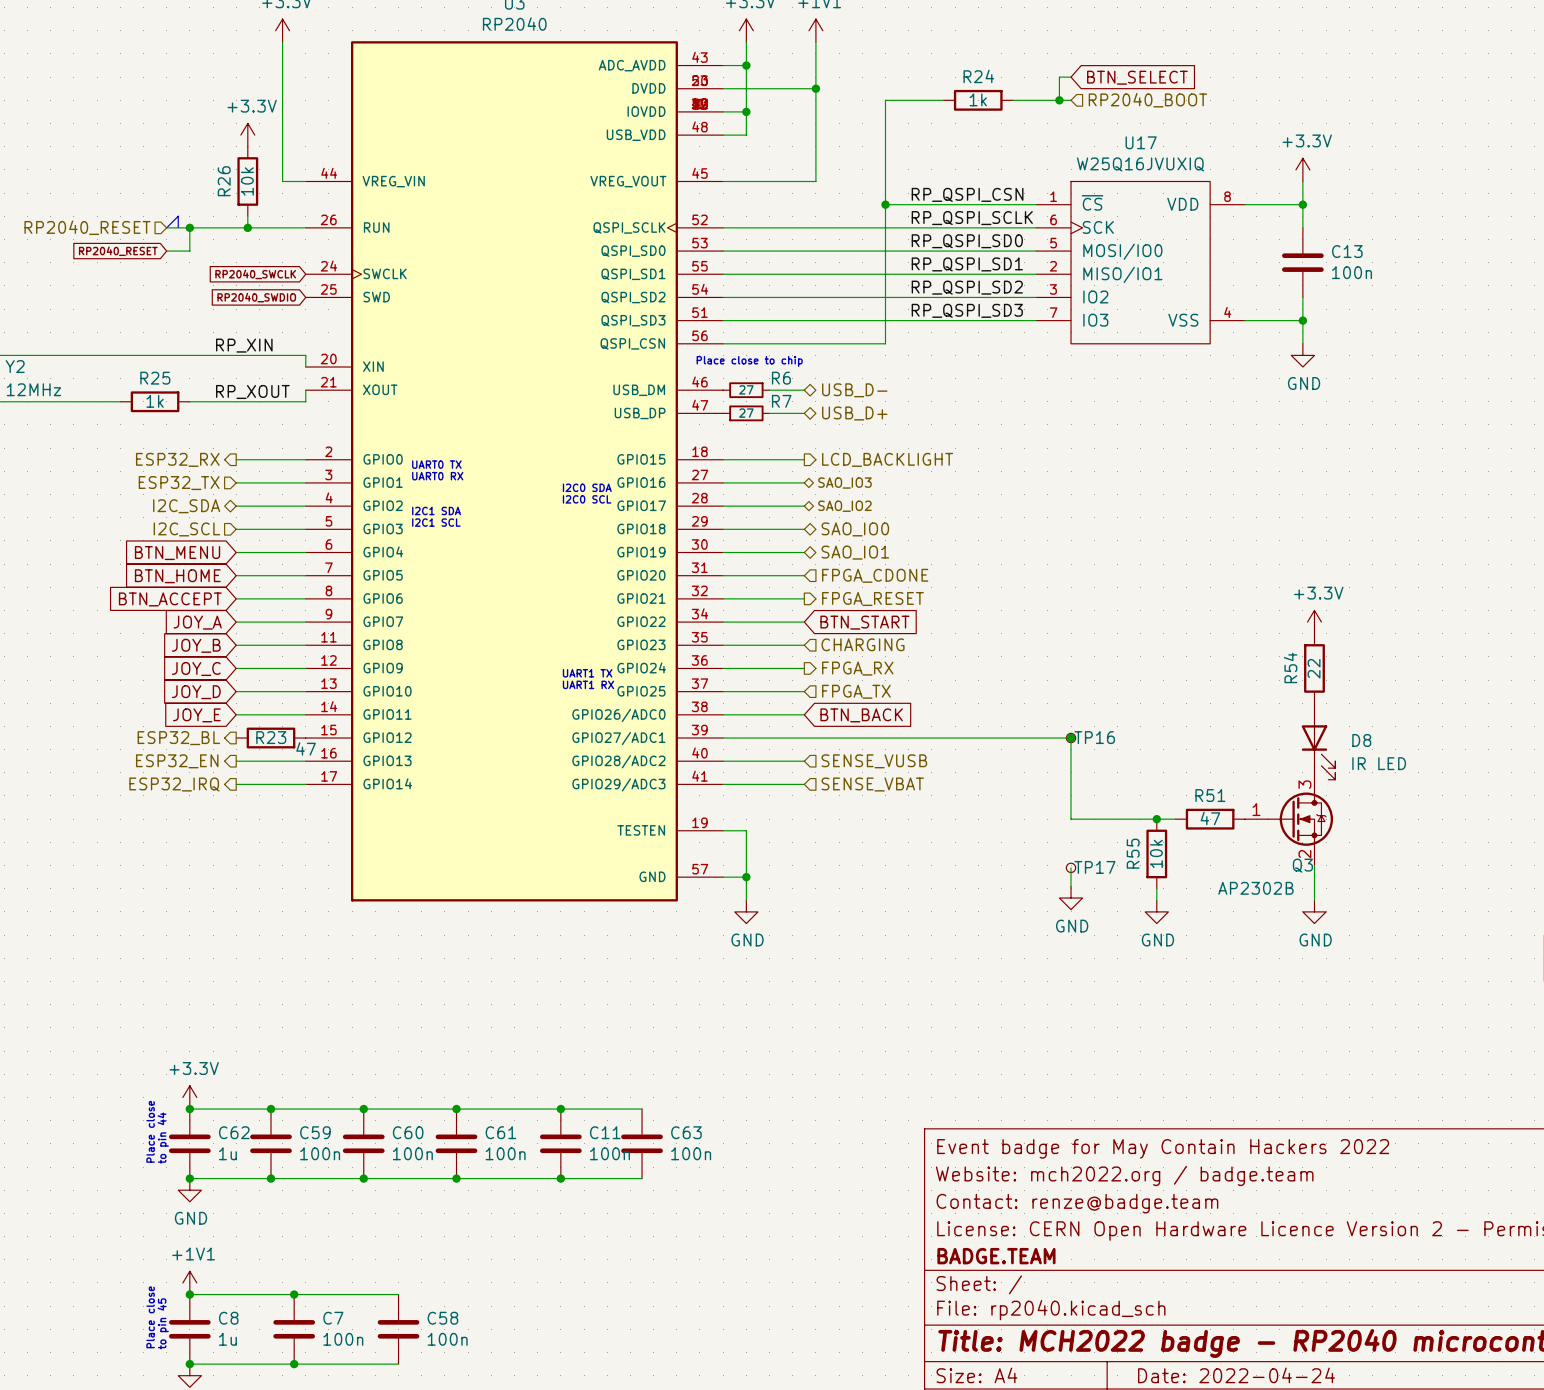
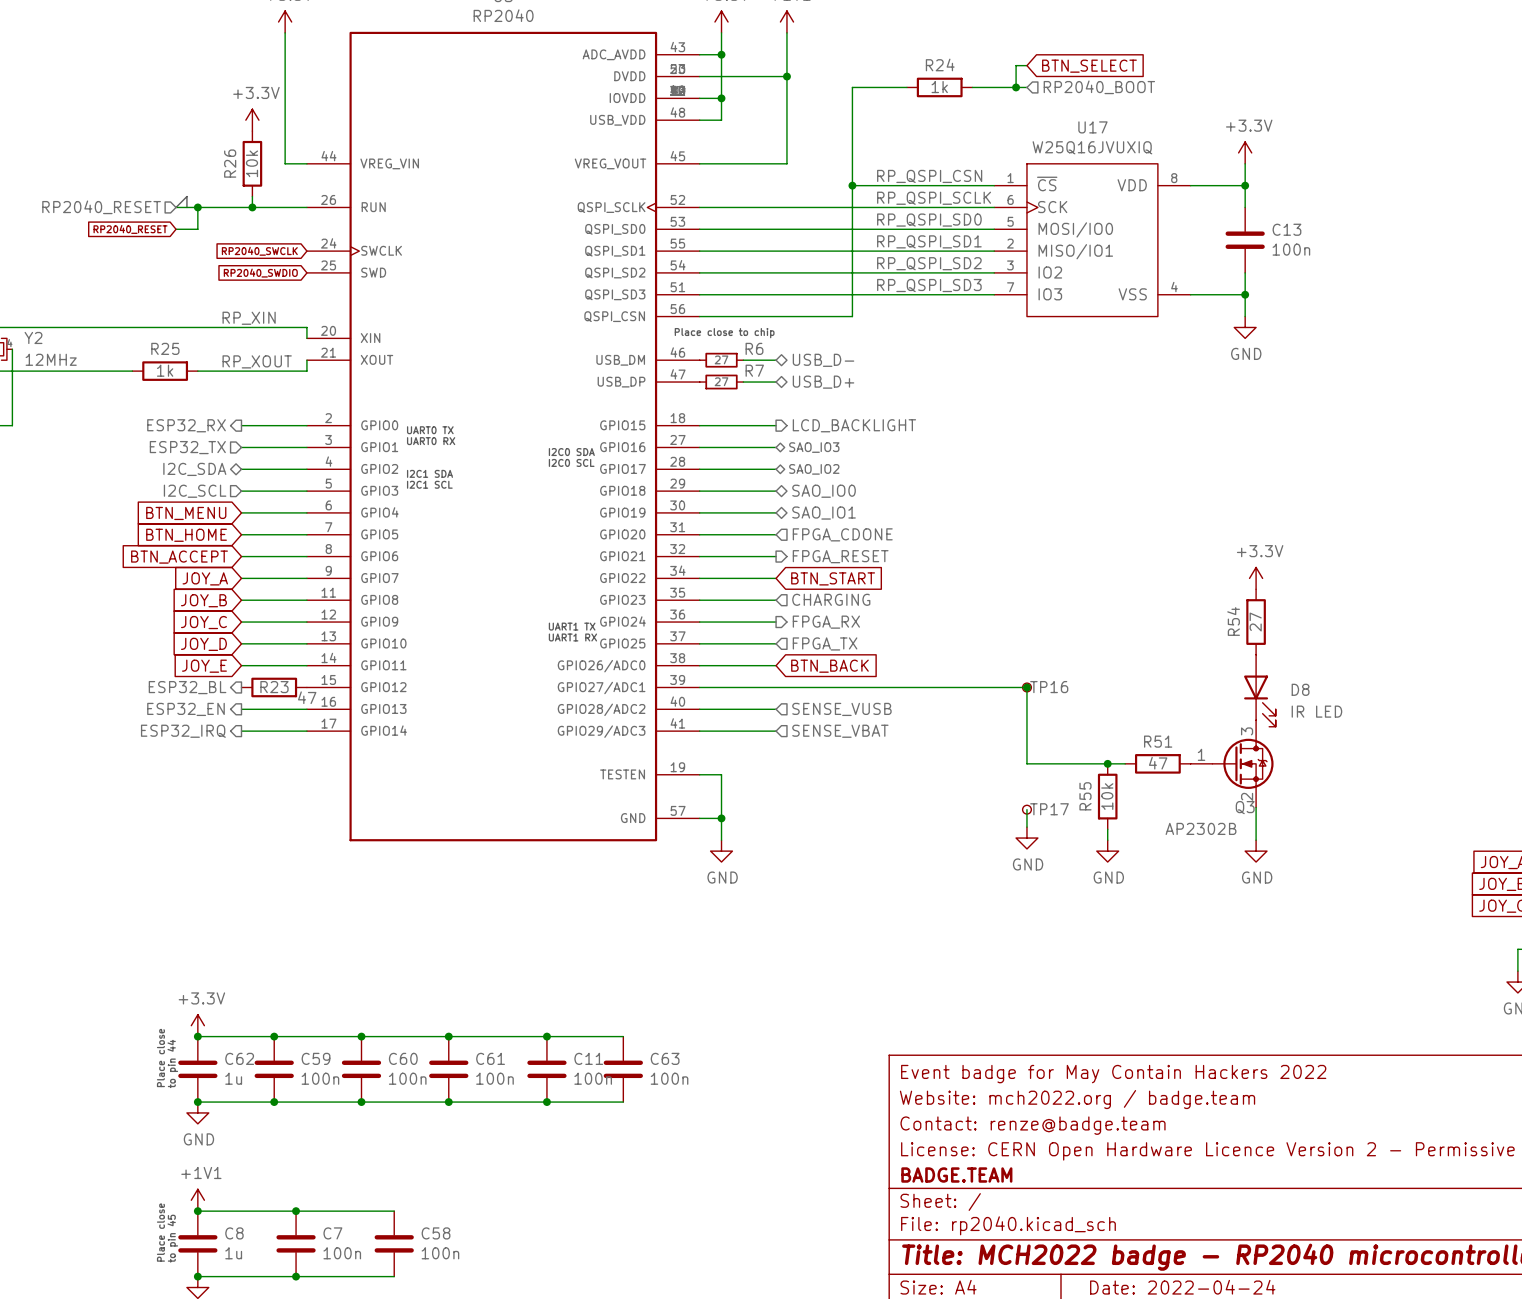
R54 value: 22 (1314, 668) -> 27 (1255, 622)

